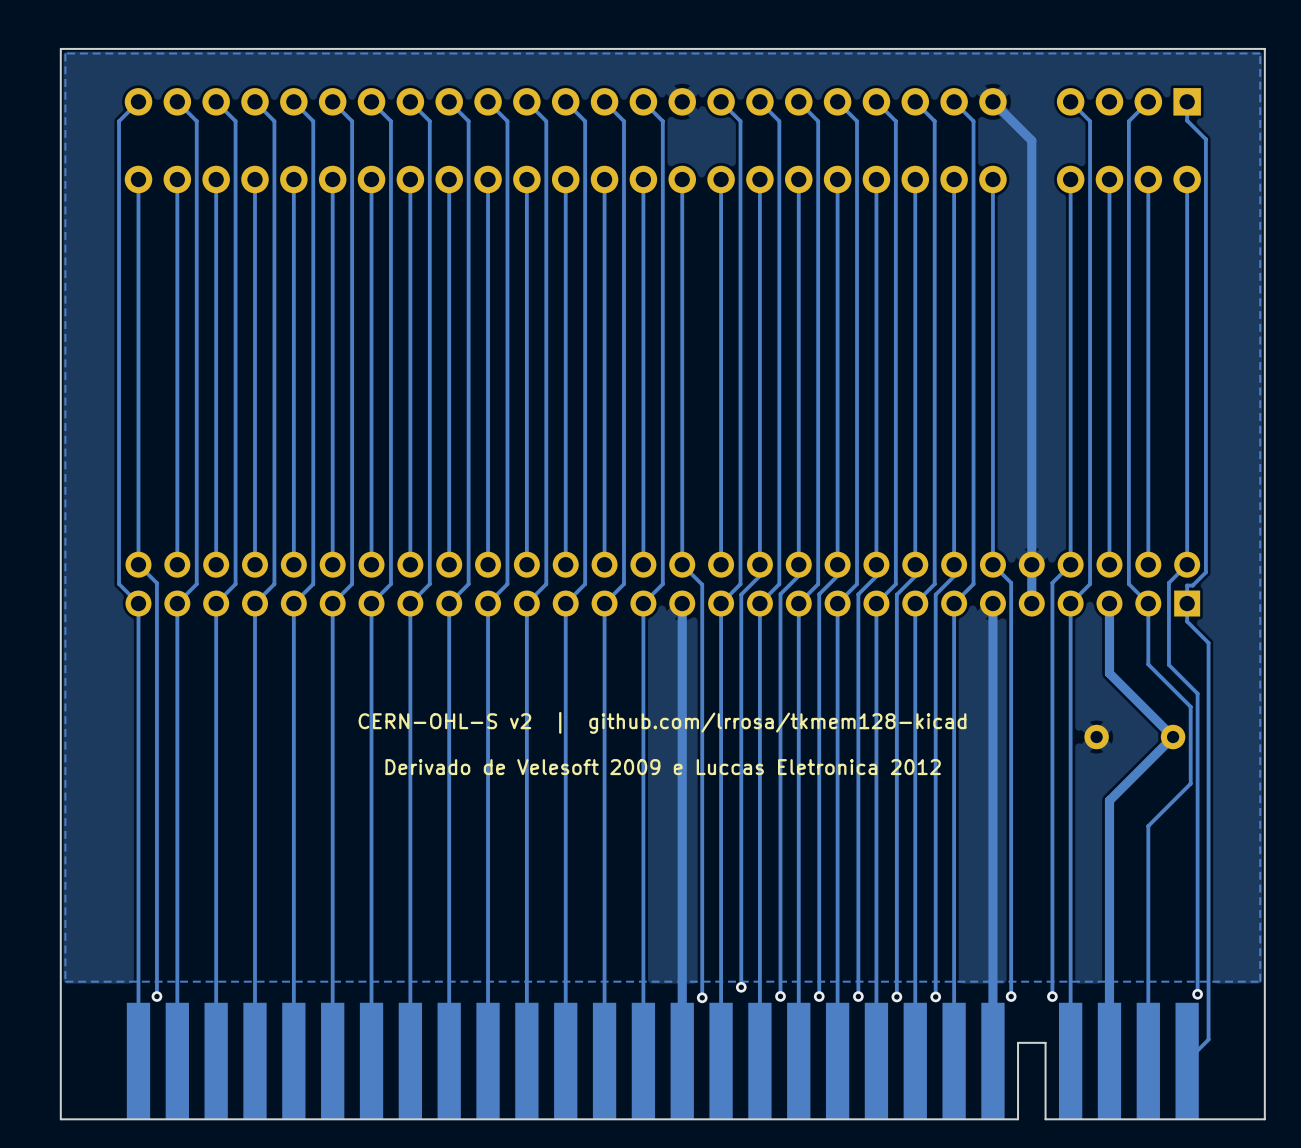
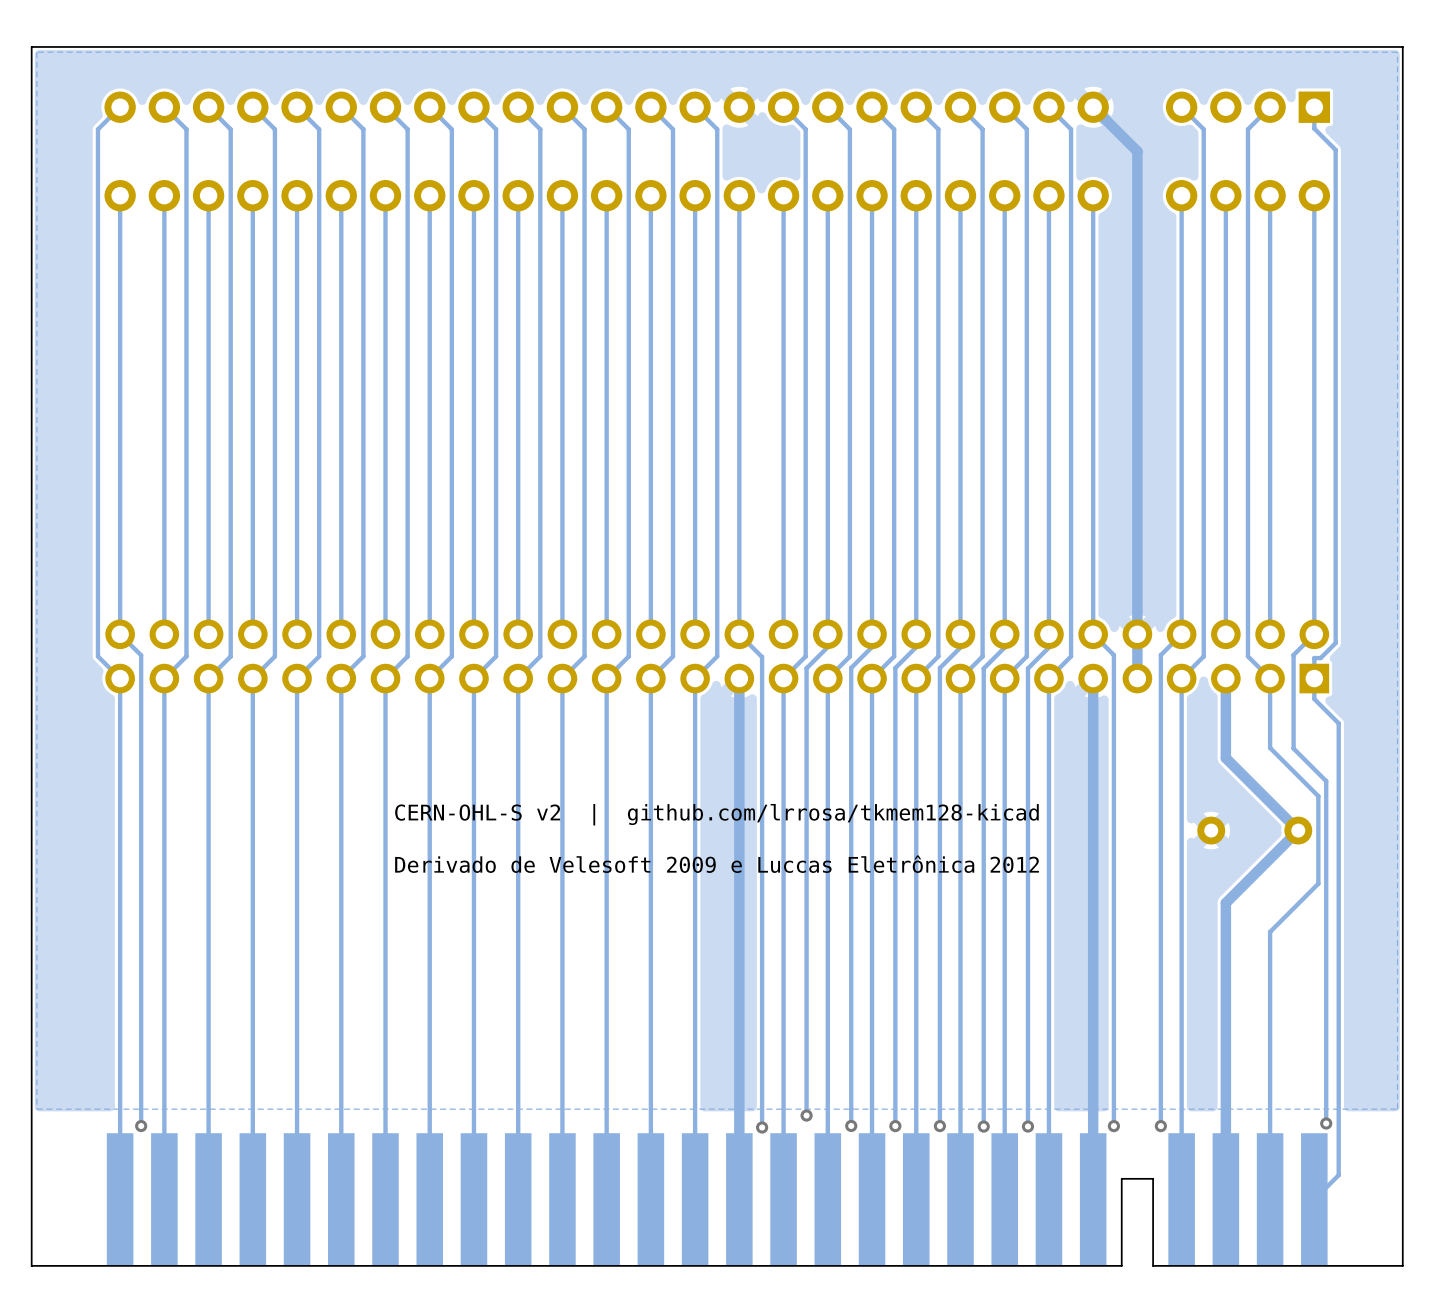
text: Derivado de Velesoft 2009 e Luccas Eletronica 2012 (663, 767) -> Derivado de Velesoft 2009 e Luccas Eletrônica 2012 (717, 864)

